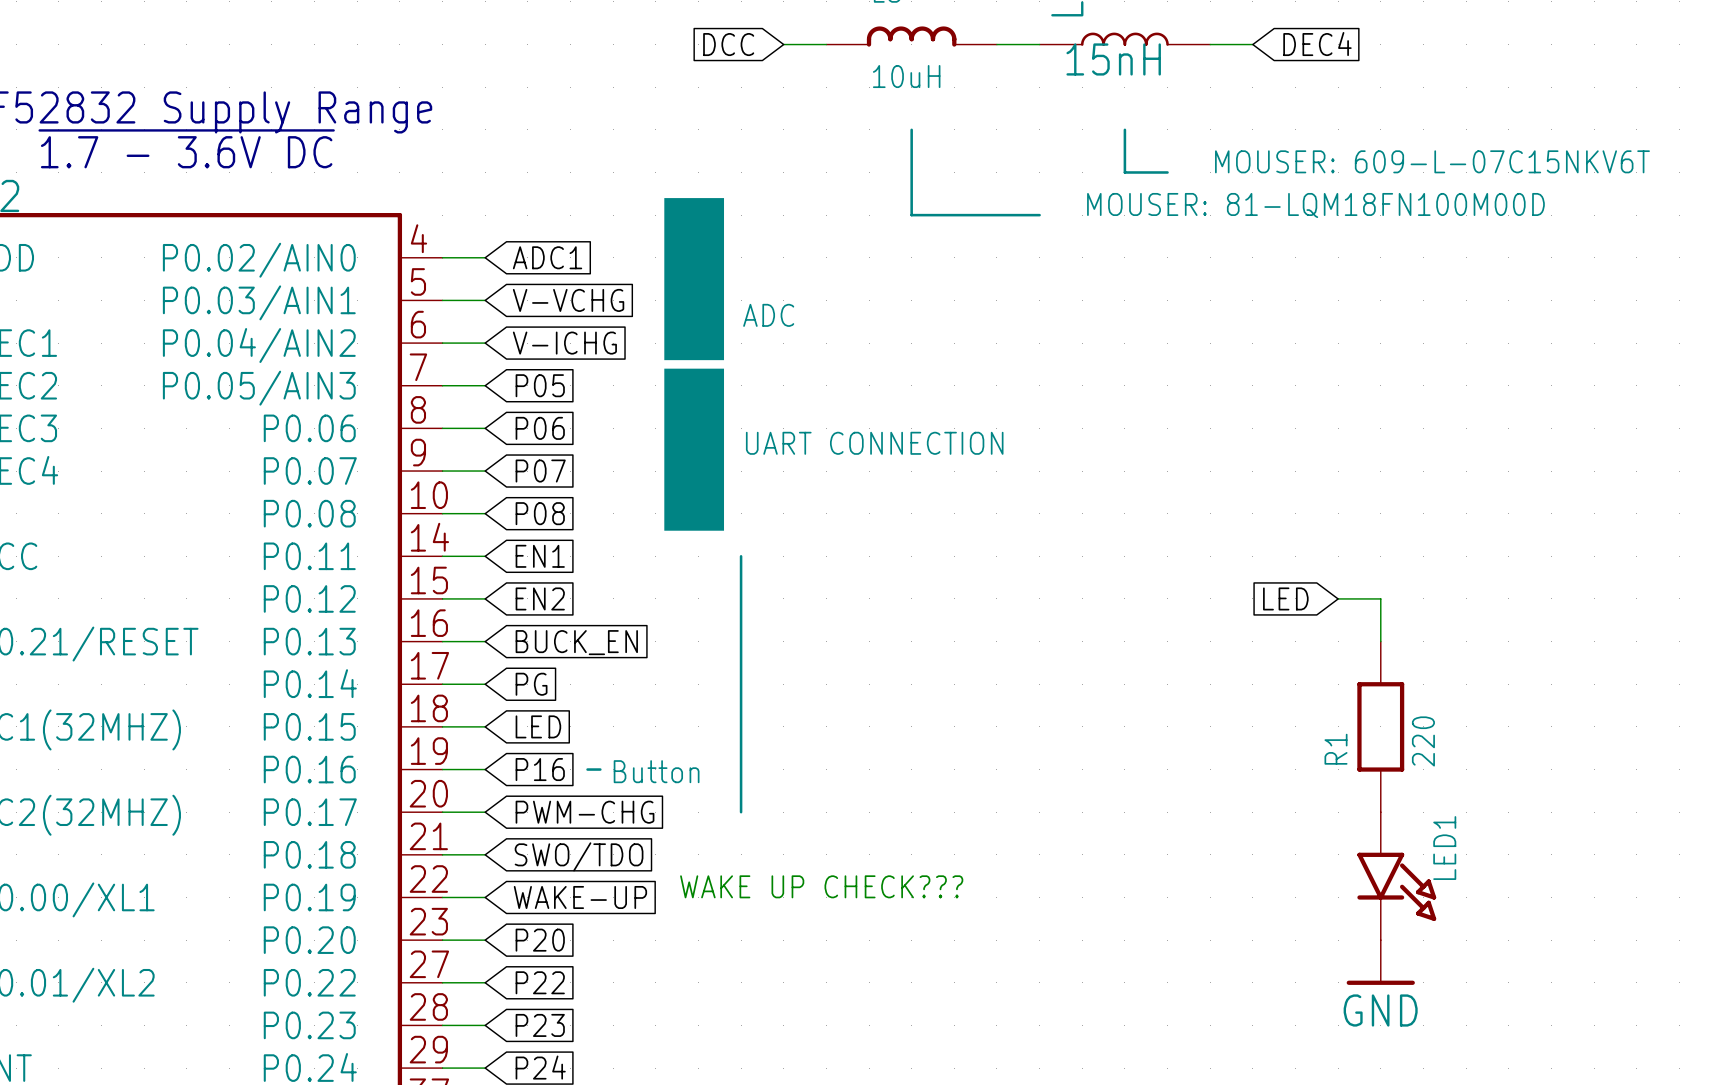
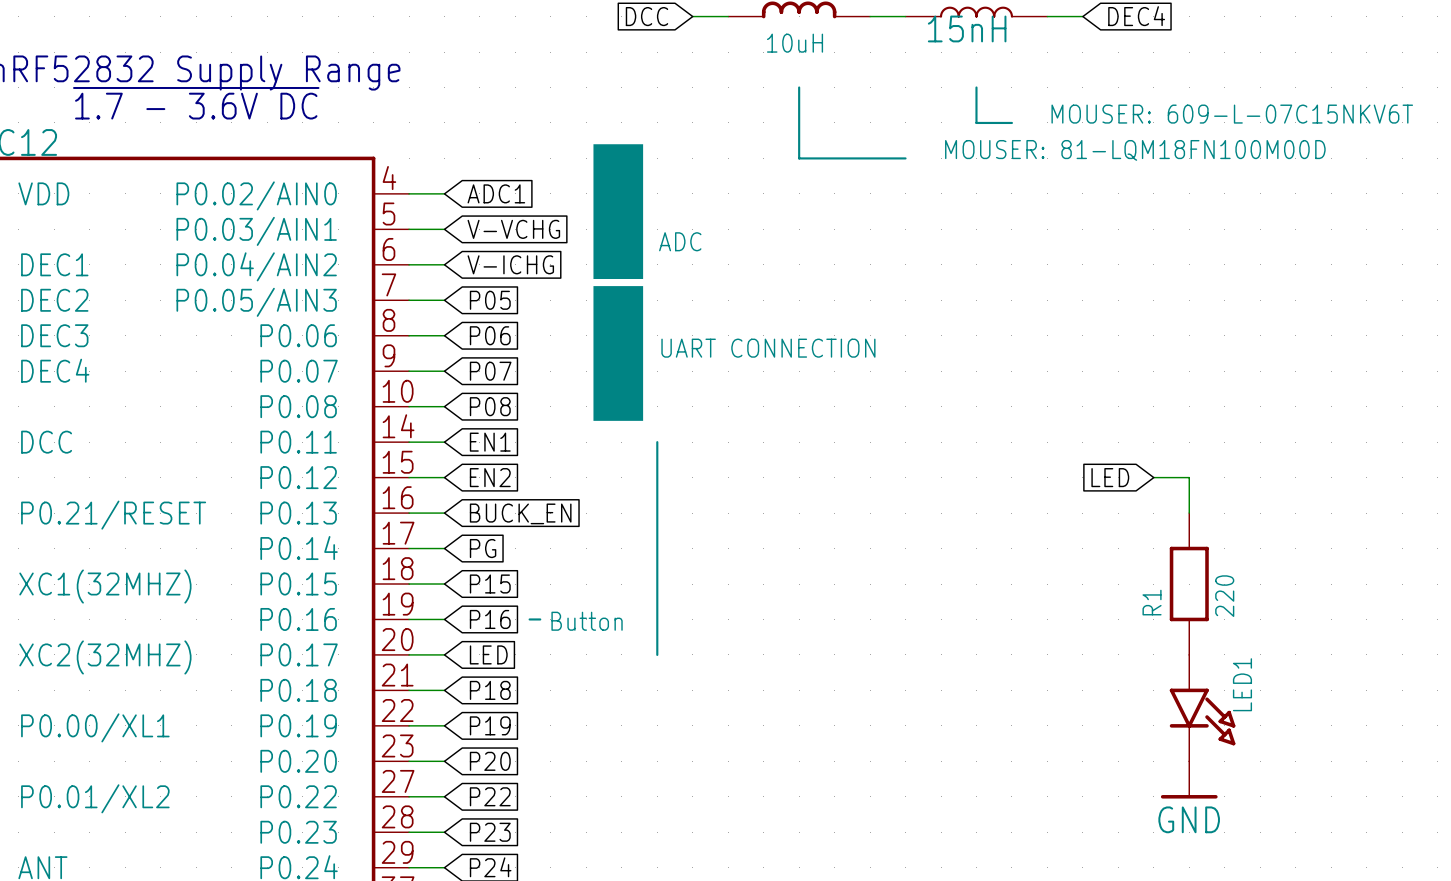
global label: LED (538, 726) -> P15 (490, 584)
global label: PWM-CHG (585, 812) -> LED (488, 654)
global label: SWO/TDO (579, 856) -> P18 (490, 690)
text: WAKE UP CHECK??? (821, 886) -> none
global label: WAKE-UP (580, 897) -> P19 (490, 725)

